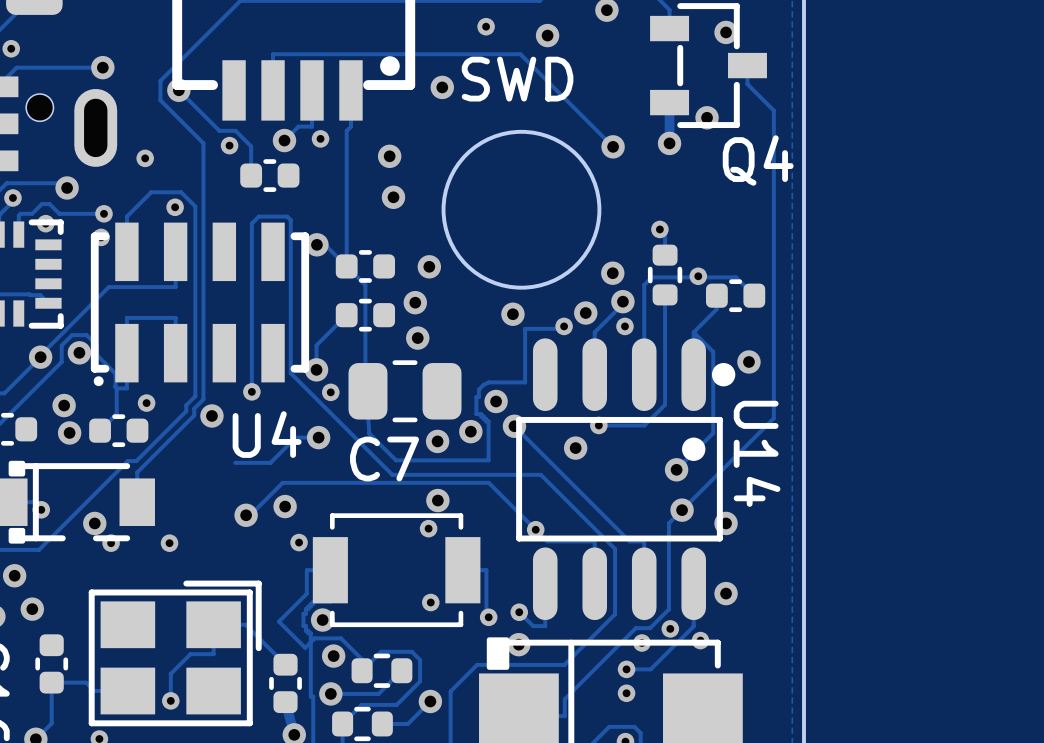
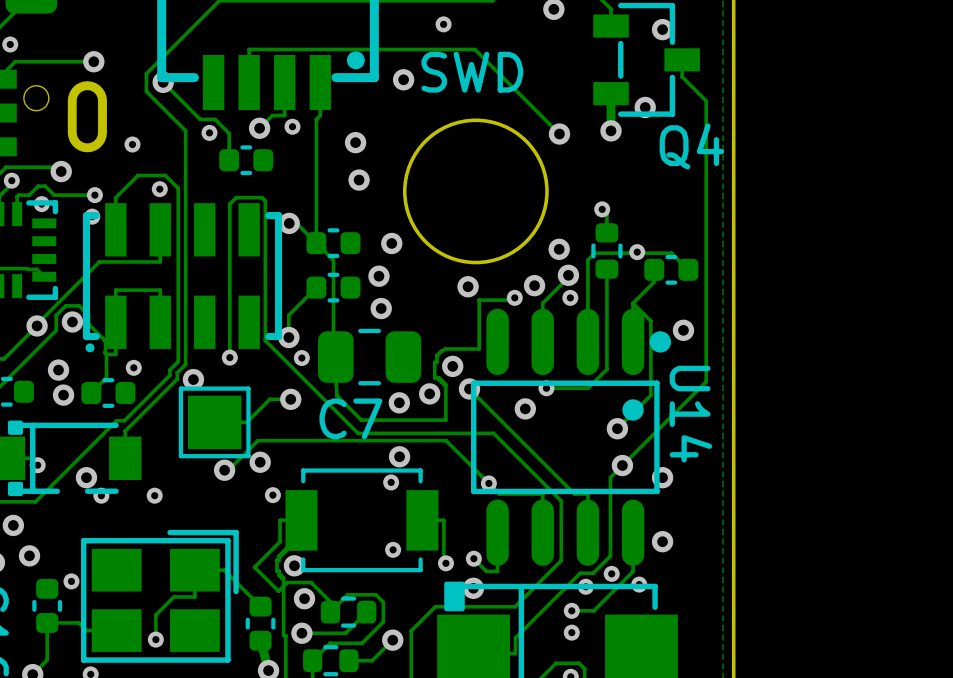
via: (547, 35) -> none
U4 name: U4 (267, 434) -> none
part: none -> (214, 422)
via: none -> (71, 581)

